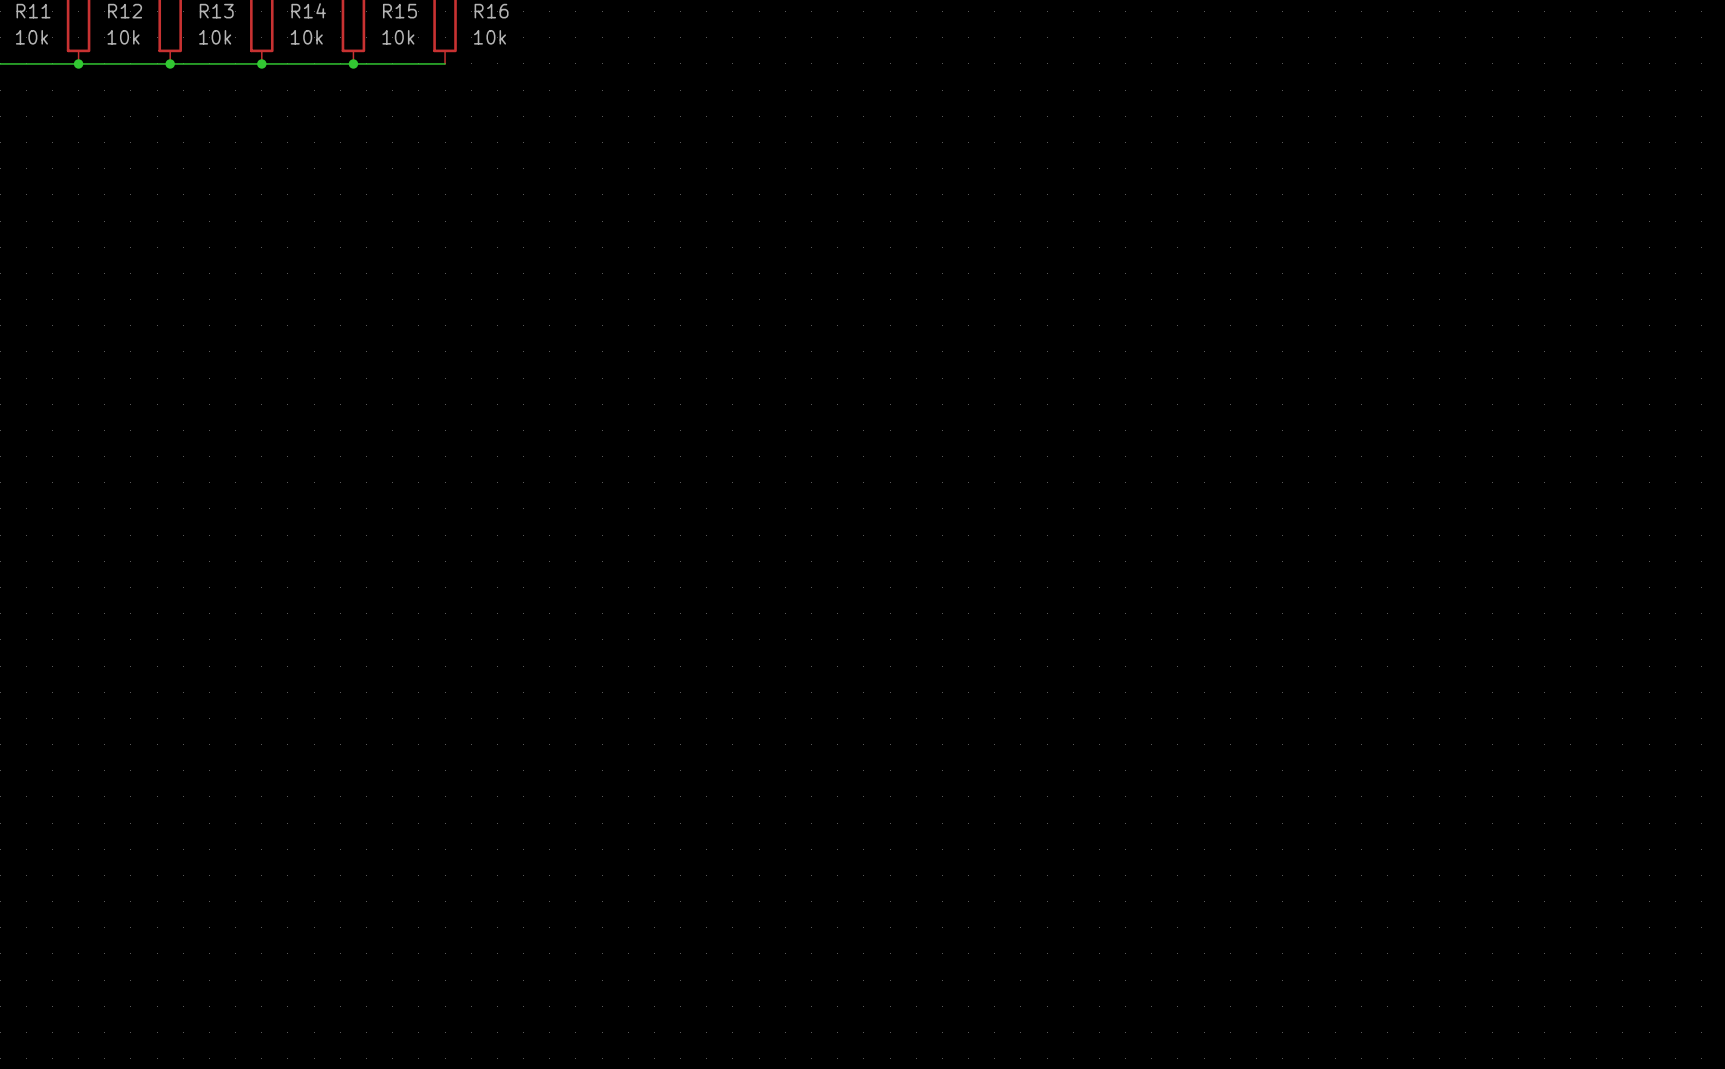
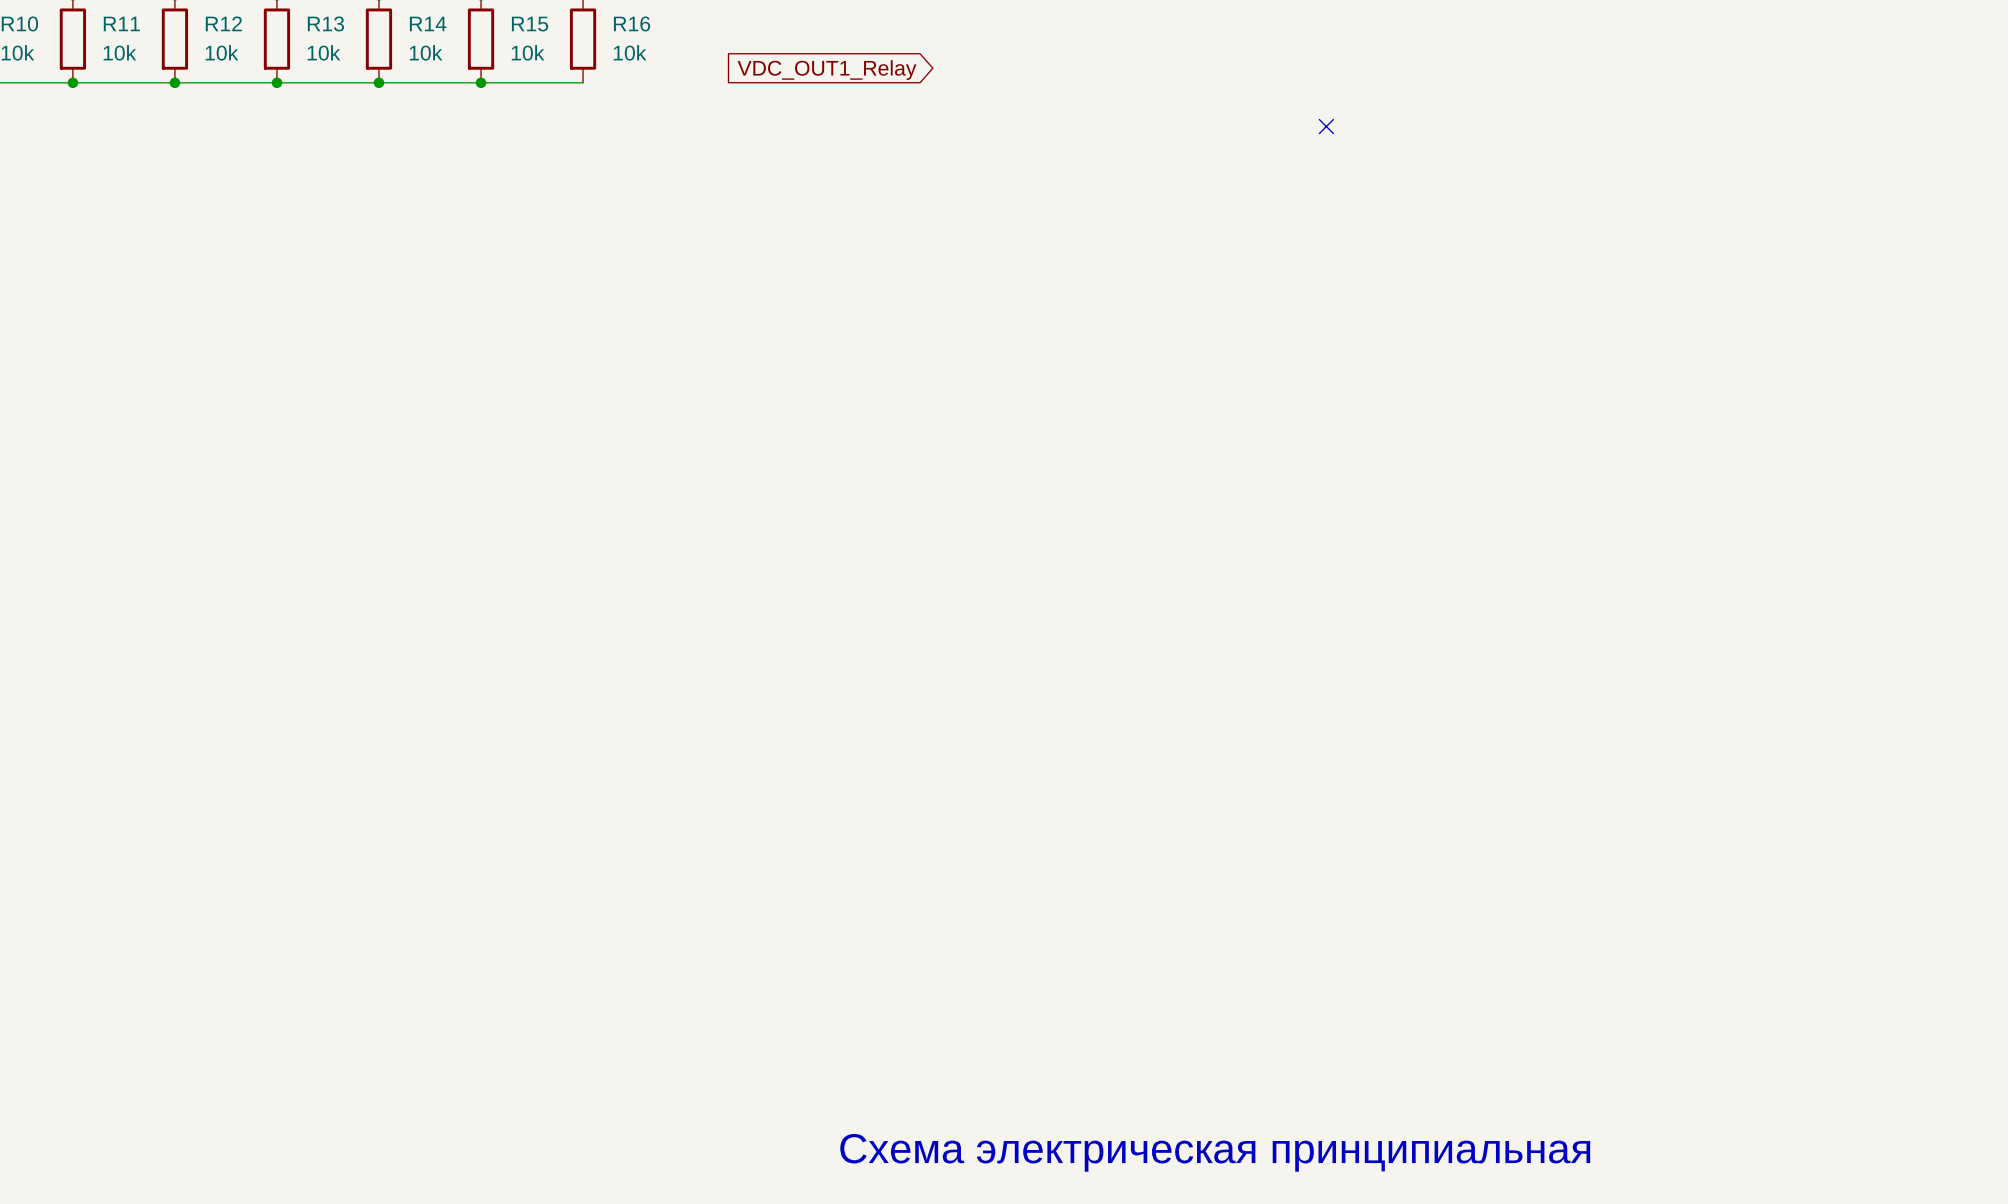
global label: none -> VDC_OUT1_Relay (827, 70)
no-connect mark: none -> (1326, 126)
text: none -> Схема электрическая принципиальная (1215, 1152)

